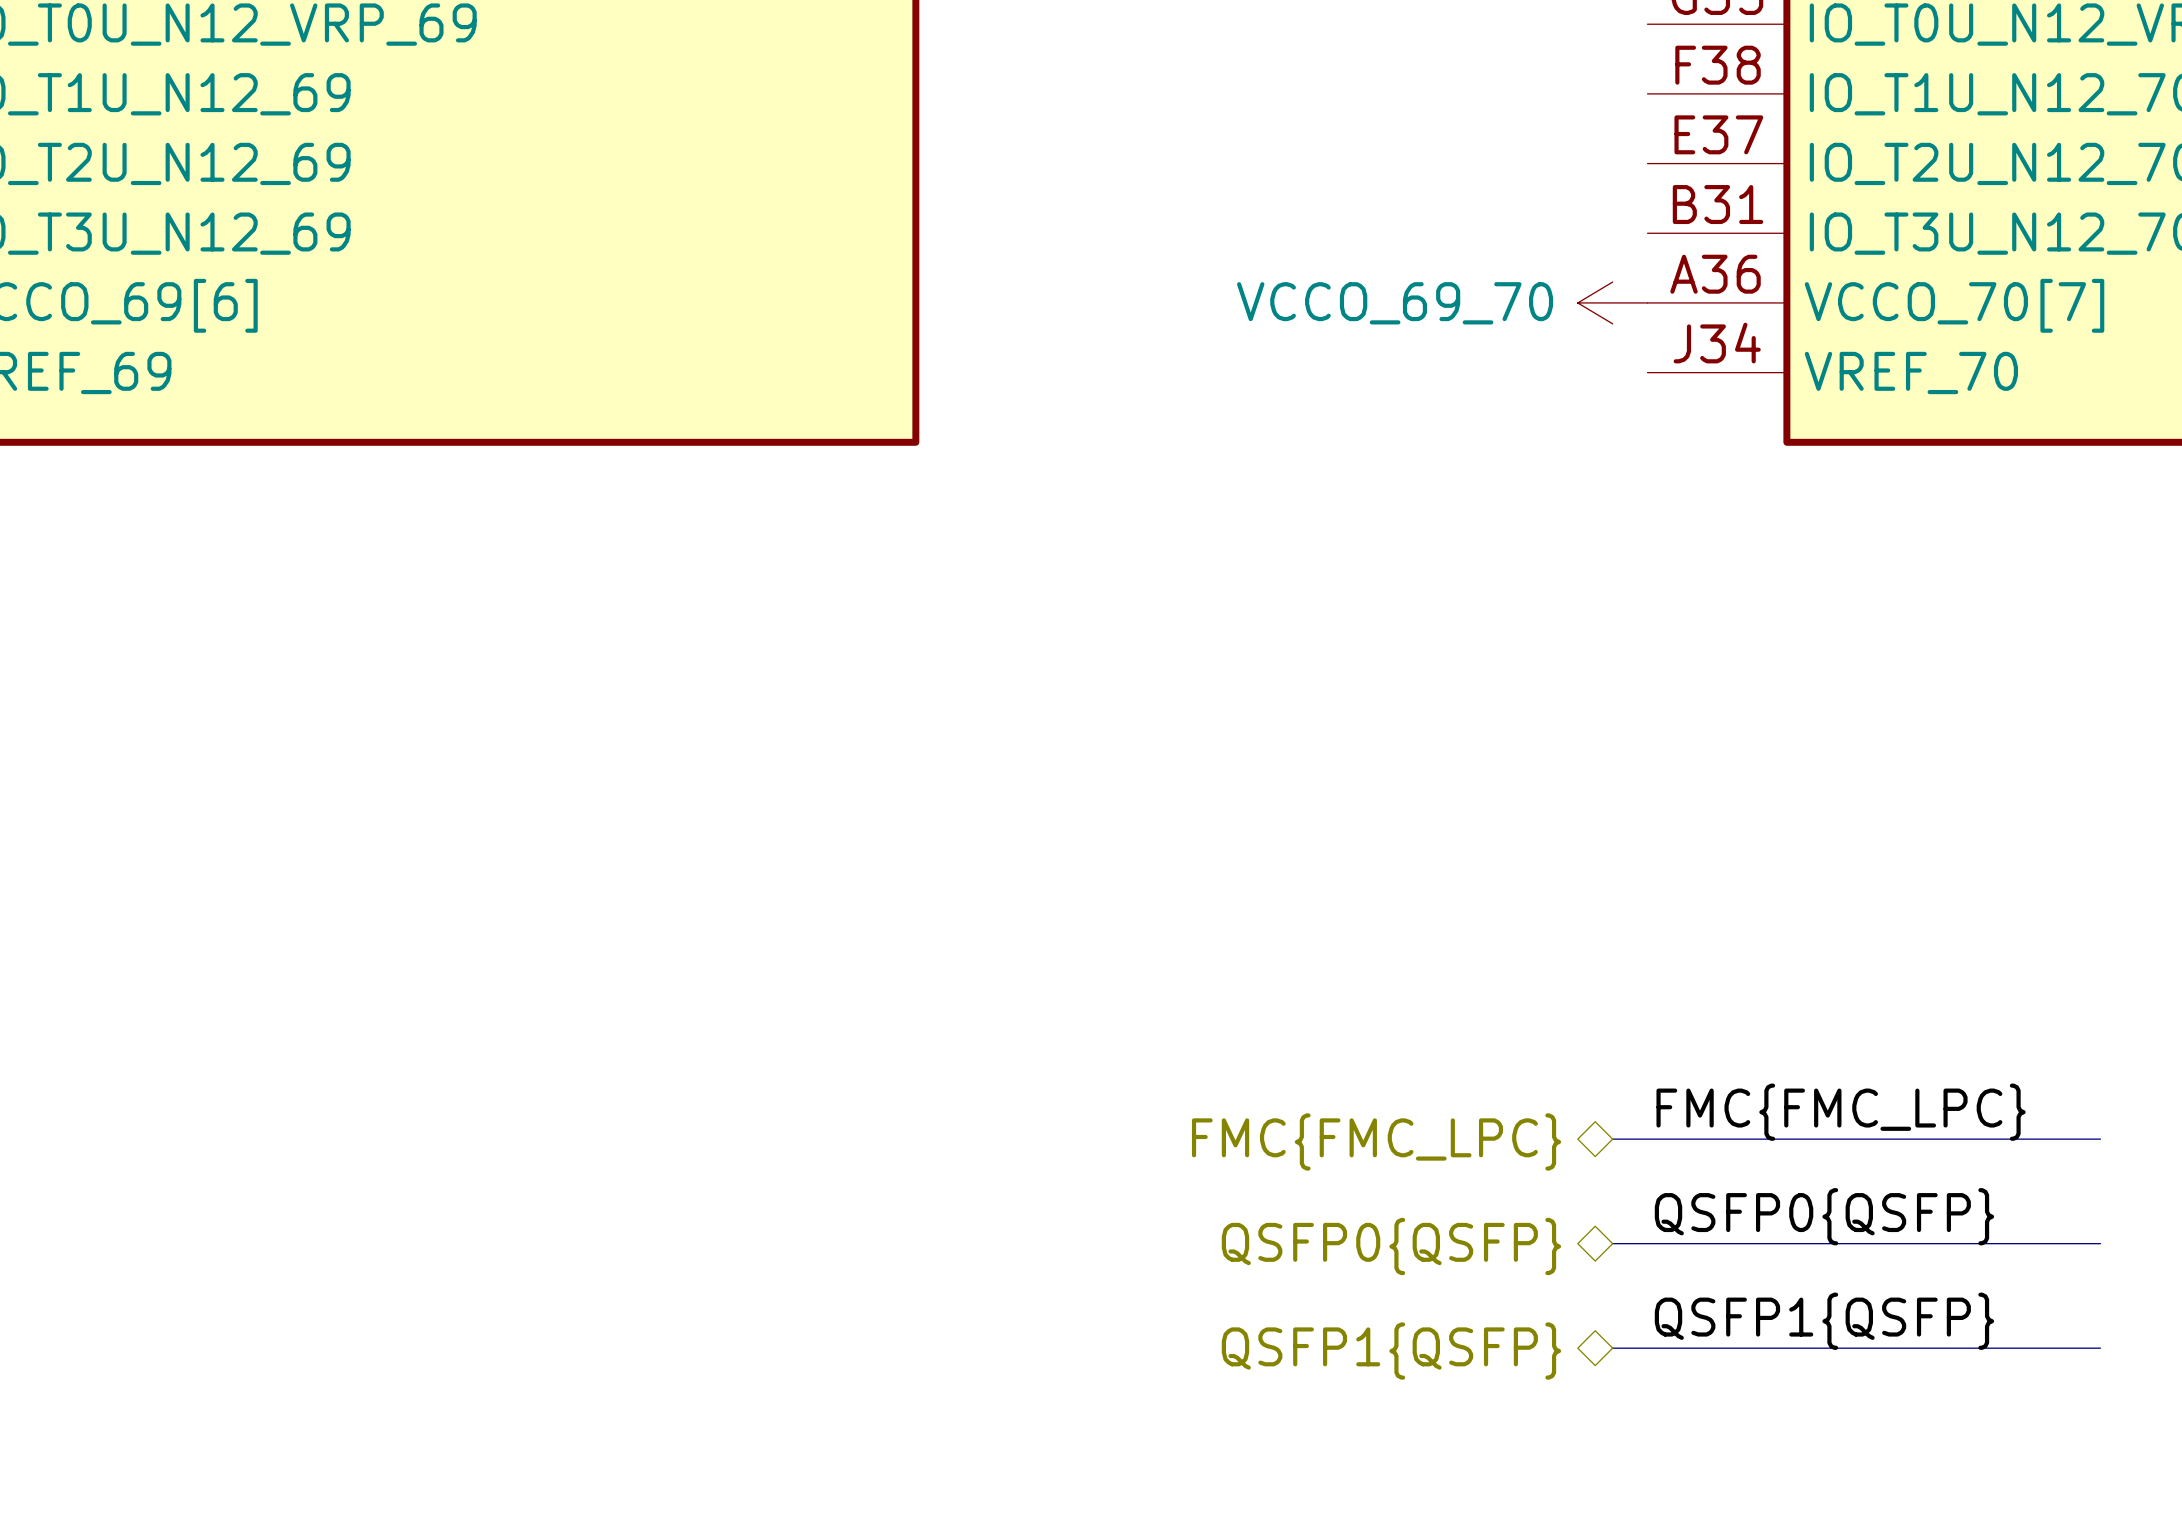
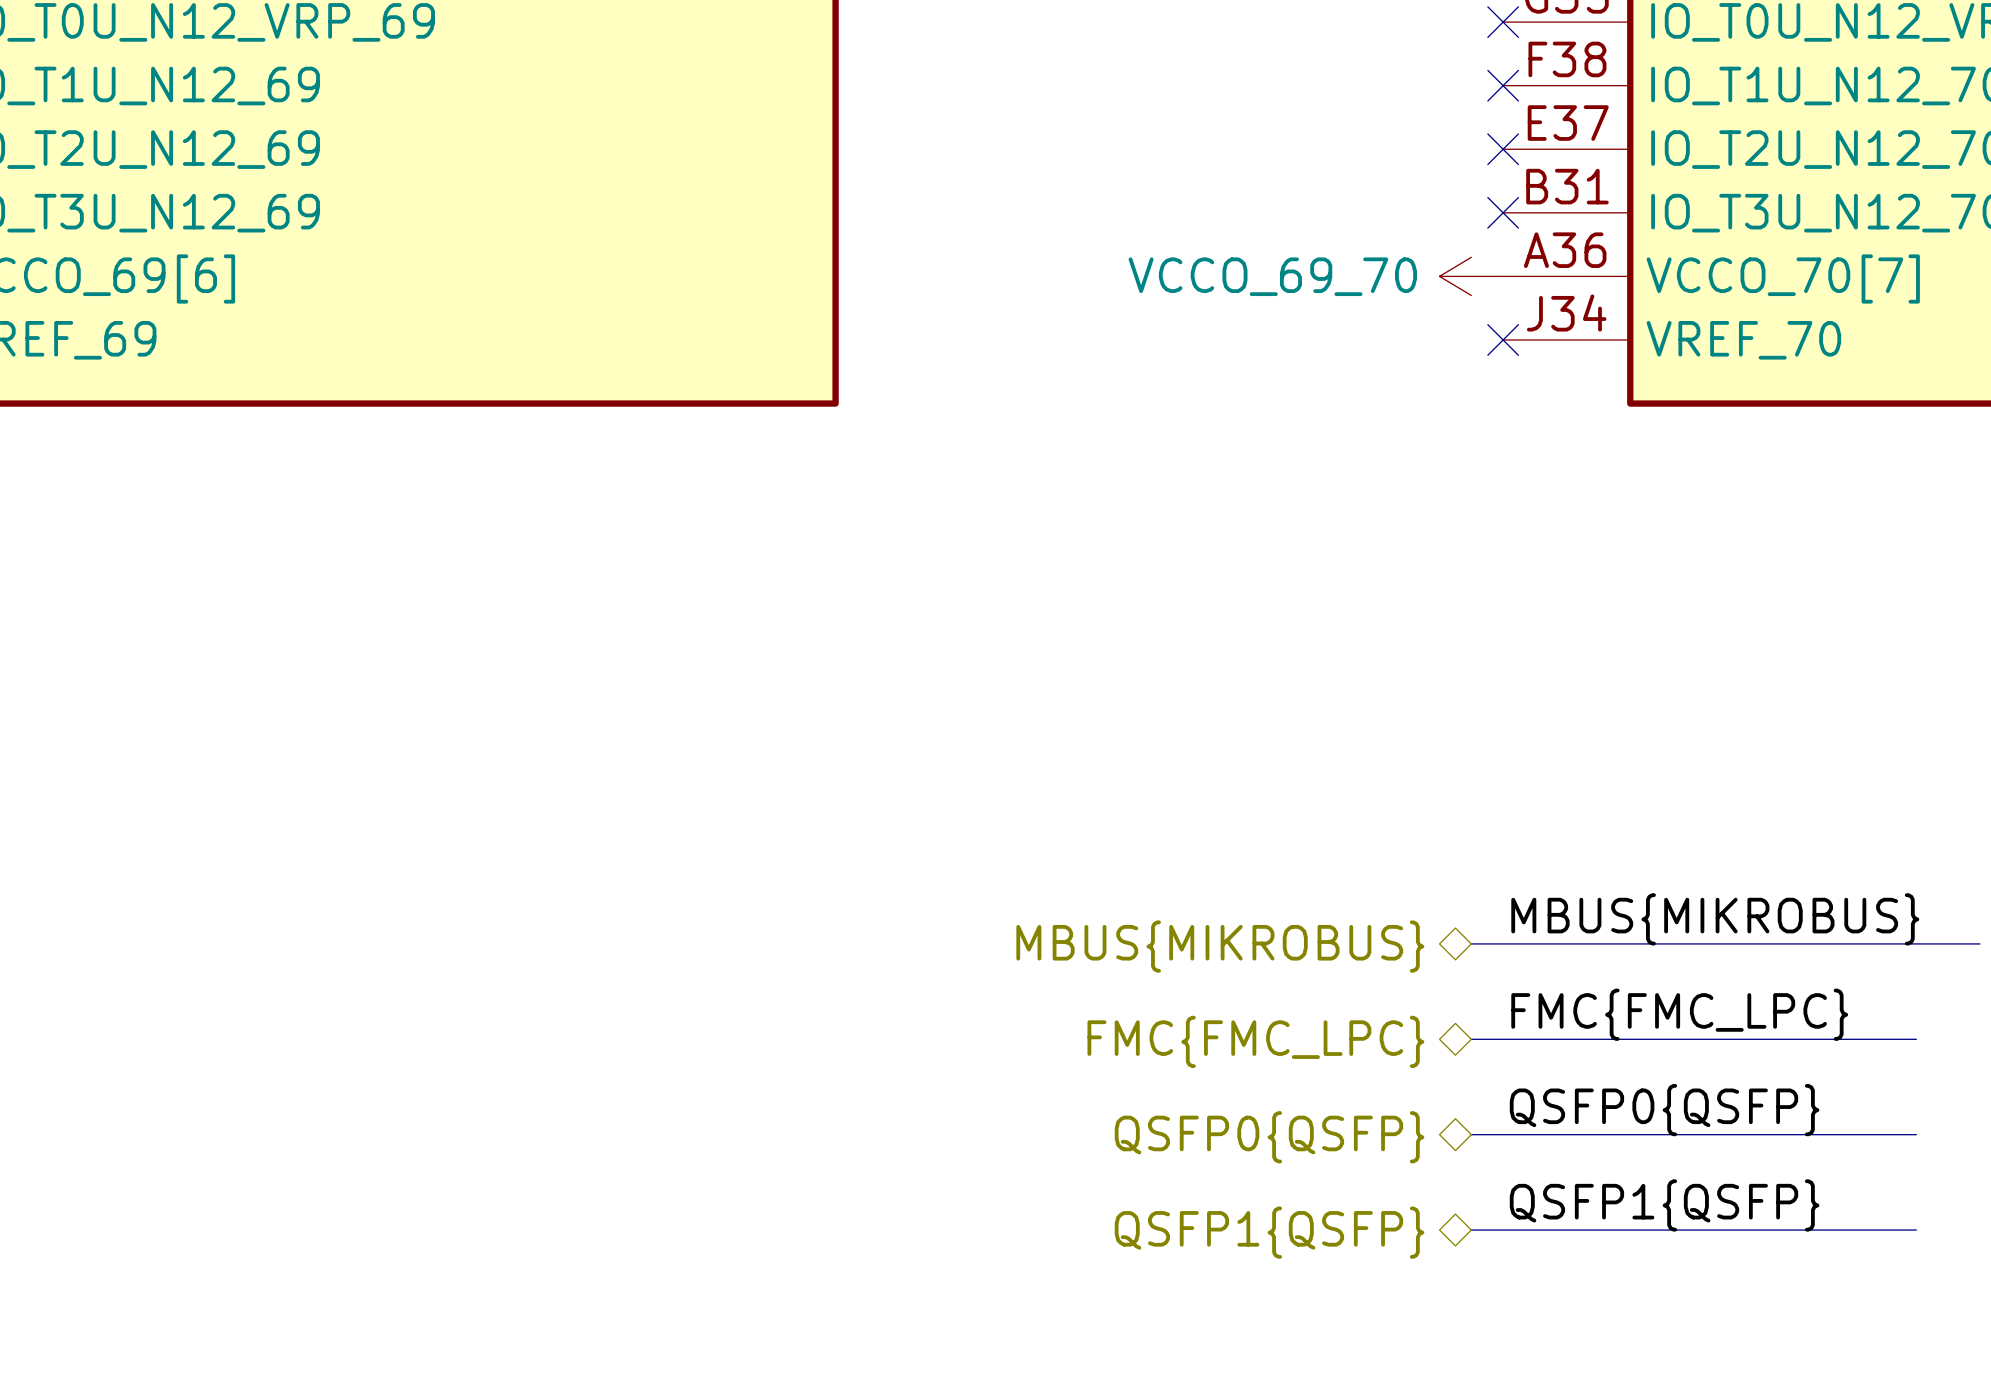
no-connect mark: none -> (1503, 22)
no-connect mark: none -> (1503, 85)
no-connect mark: none -> (1503, 149)
no-connect mark: none -> (1503, 212)
no-connect mark: none -> (1503, 339)
label: none -> MBUS{MIKROBUS} (1715, 919)
bus: none -> (1471, 943) (1979, 943)
hierarchical label: none -> MBUS{MIKROBUS} (1220, 946)

